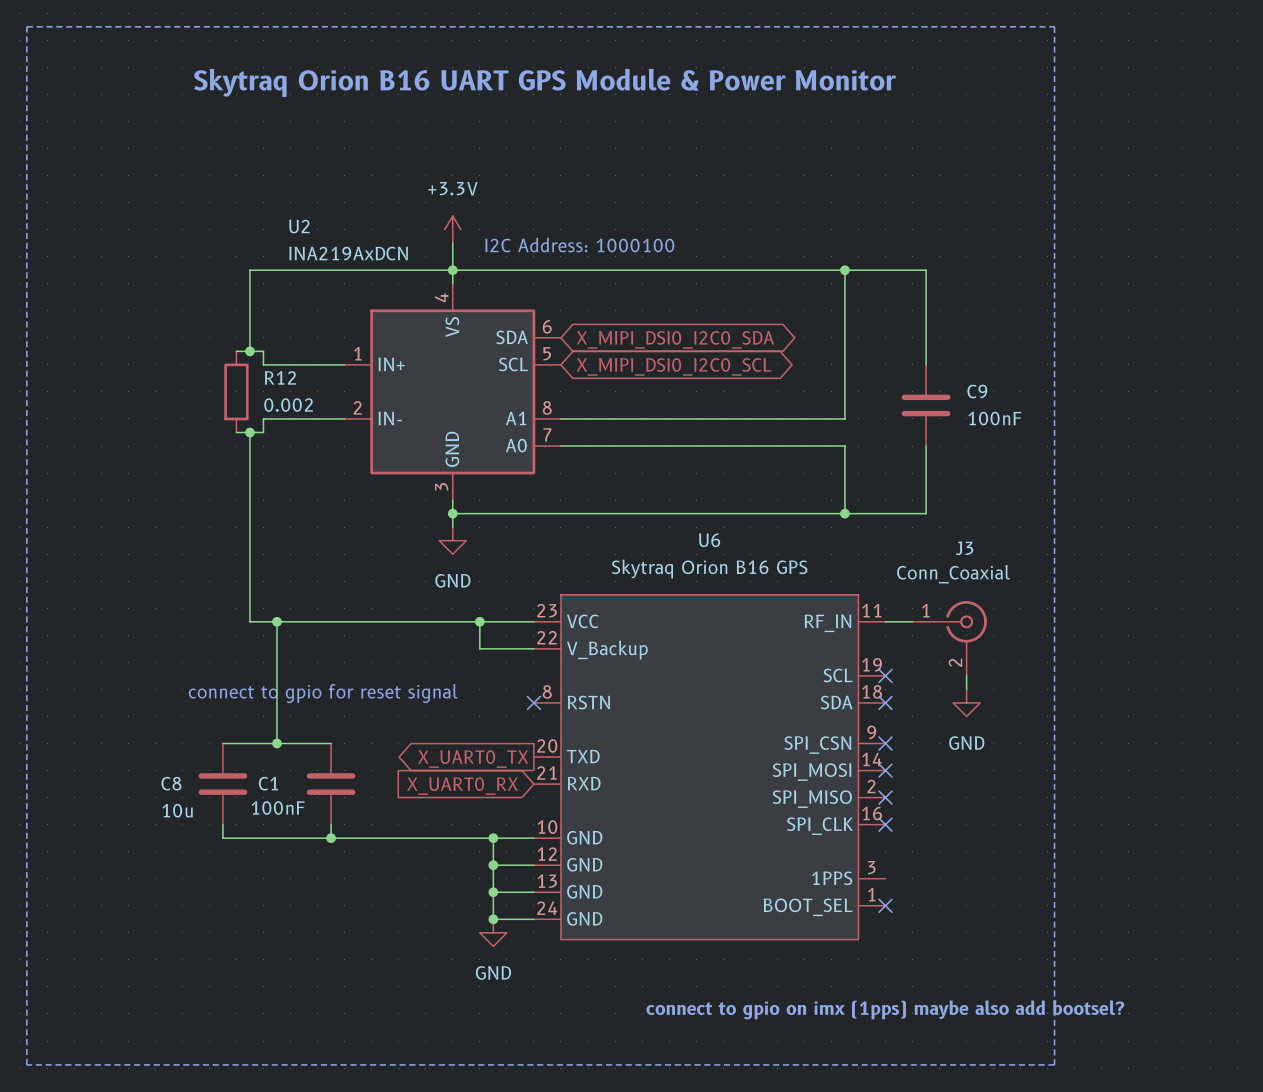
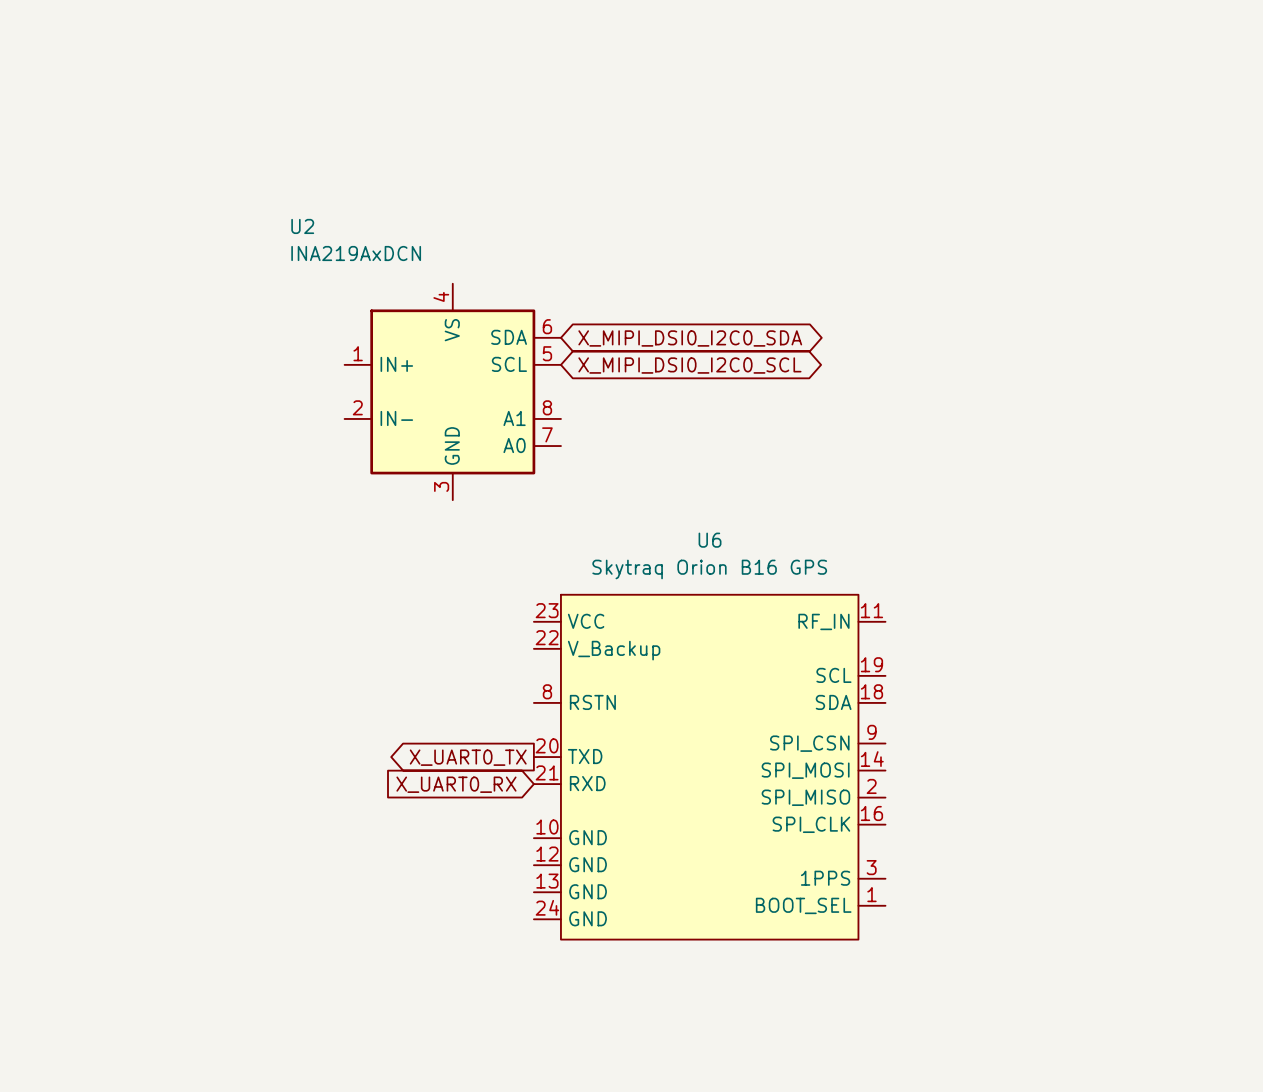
line: (26, 26) (1054, 26) (1054, 1064) (26, 1064) (26, 26) -> none
text: Skytraq Orion B16 UART GPS Module & Power Monitor (544, 82) -> none
power symbol: +3.3V (452, 229) -> none
wire: (452, 243) (452, 283) -> none
text: I2C Address: 1000100 (579, 245) -> none
junction: (452, 270) -> none
wire: (844, 270) (844, 418) (560, 418) -> none
junction: (844, 270) -> none
wire: (236, 351) (263, 351) (263, 364) (344, 364) -> none
wire: (249, 351) (249, 270) (926, 270) (926, 364) -> none
junction: (249, 351) -> none
R12: 0.002 (236, 391) -> none
C9: 100nF (926, 405) -> none
wire: (344, 418) (263, 418) (263, 432) (236, 432) -> none
wire: (249, 432) (249, 621) (533, 621) -> none
junction: (249, 432) -> none
wire: (560, 446) (844, 446) (844, 513) -> none
wire: (926, 446) (926, 513) (452, 513) -> none
wire: (452, 500) (452, 527) -> none
junction: (452, 513) -> none
junction: (844, 513) -> none
power symbol: GND (452, 540) -> none
wire: (276, 621) (276, 743) -> none
junction: (276, 621) -> none
wire: (479, 621) (479, 648) (533, 648) -> none
junction: (479, 621) -> none
wire: (885, 621) (912, 621) -> none
J3: Conn_Coaxial (949, 638) -> none
no-connect mark: (885, 675) -> none
wire: (966, 675) (966, 689) -> none
text: connect to gpio for reset signal (323, 693) -> none
no-connect mark: (533, 702) -> none
no-connect mark: (885, 702) -> none
power symbol: GND (966, 702) -> none
wire: (222, 743) (331, 743) -> none
junction: (276, 743) -> none
no-connect mark: (885, 743) -> none
no-connect mark: (885, 770) -> none
C8: 10u (222, 784) -> none
C1: 100nF (331, 784) -> none
no-connect mark: (885, 797) -> none
wire: (222, 824) (222, 838) (533, 838) -> none
wire: (331, 824) (331, 838) -> none
no-connect mark: (885, 824) -> none
junction: (331, 838) -> none
wire: (493, 838) (493, 919) (533, 919) -> none
junction: (493, 838) -> none
wire: (493, 865) (533, 865) -> none
junction: (493, 865) -> none
wire: (493, 892) (533, 892) -> none
junction: (493, 892) -> none
no-connect mark: (885, 905) -> none
junction: (493, 919) -> none
power symbol: GND (493, 932) -> none
text: connect to gpio on imx (1pps) maybe also add bootsel? (885, 1009) -> none

